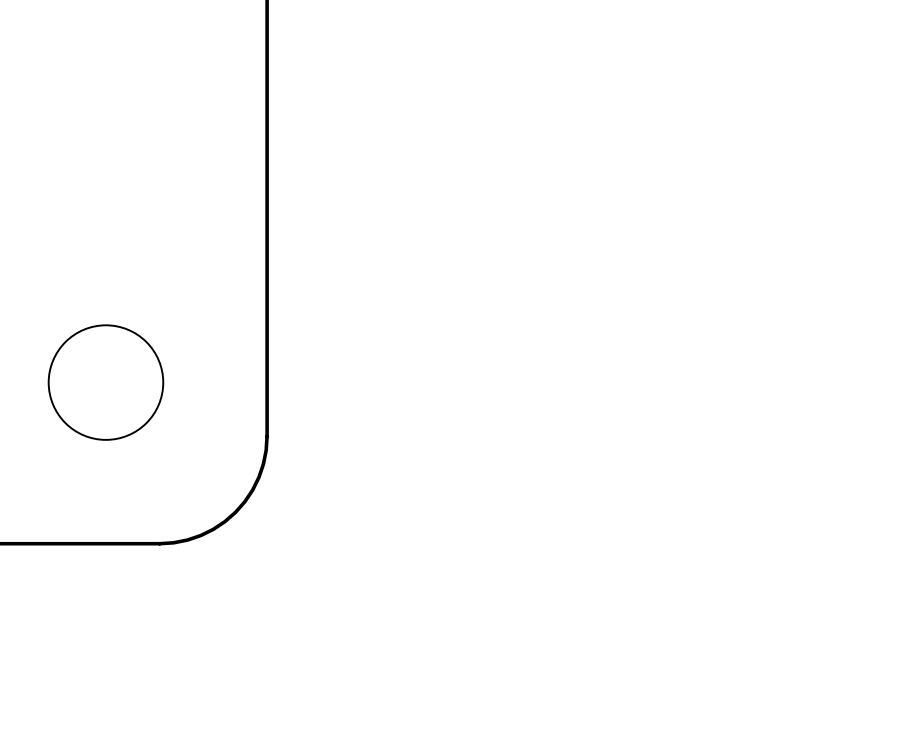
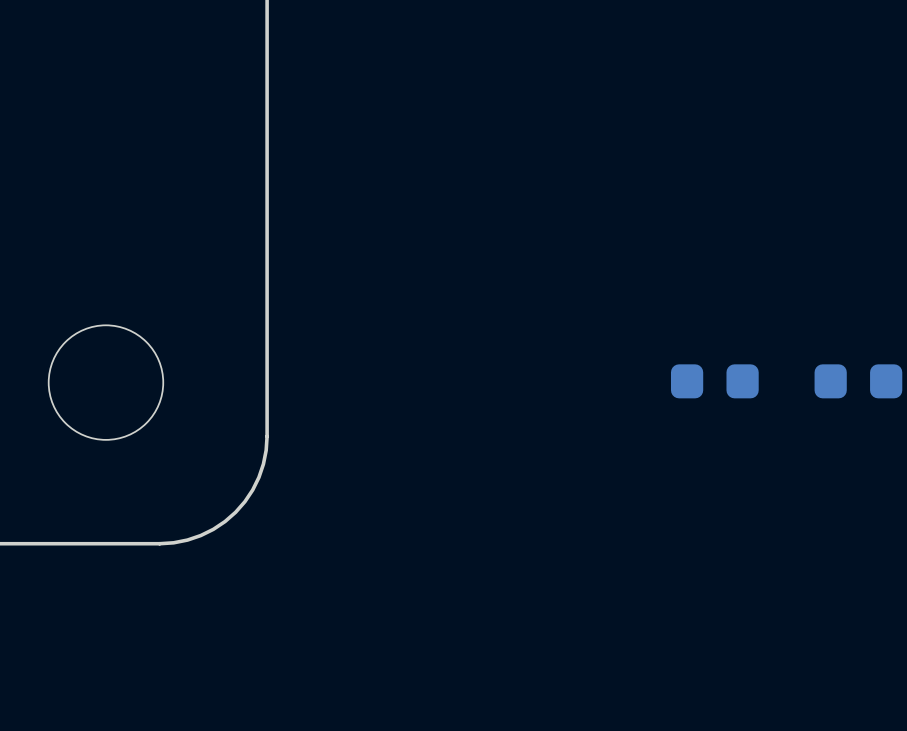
part: none -> (714, 381)
part: none -> (858, 381)

